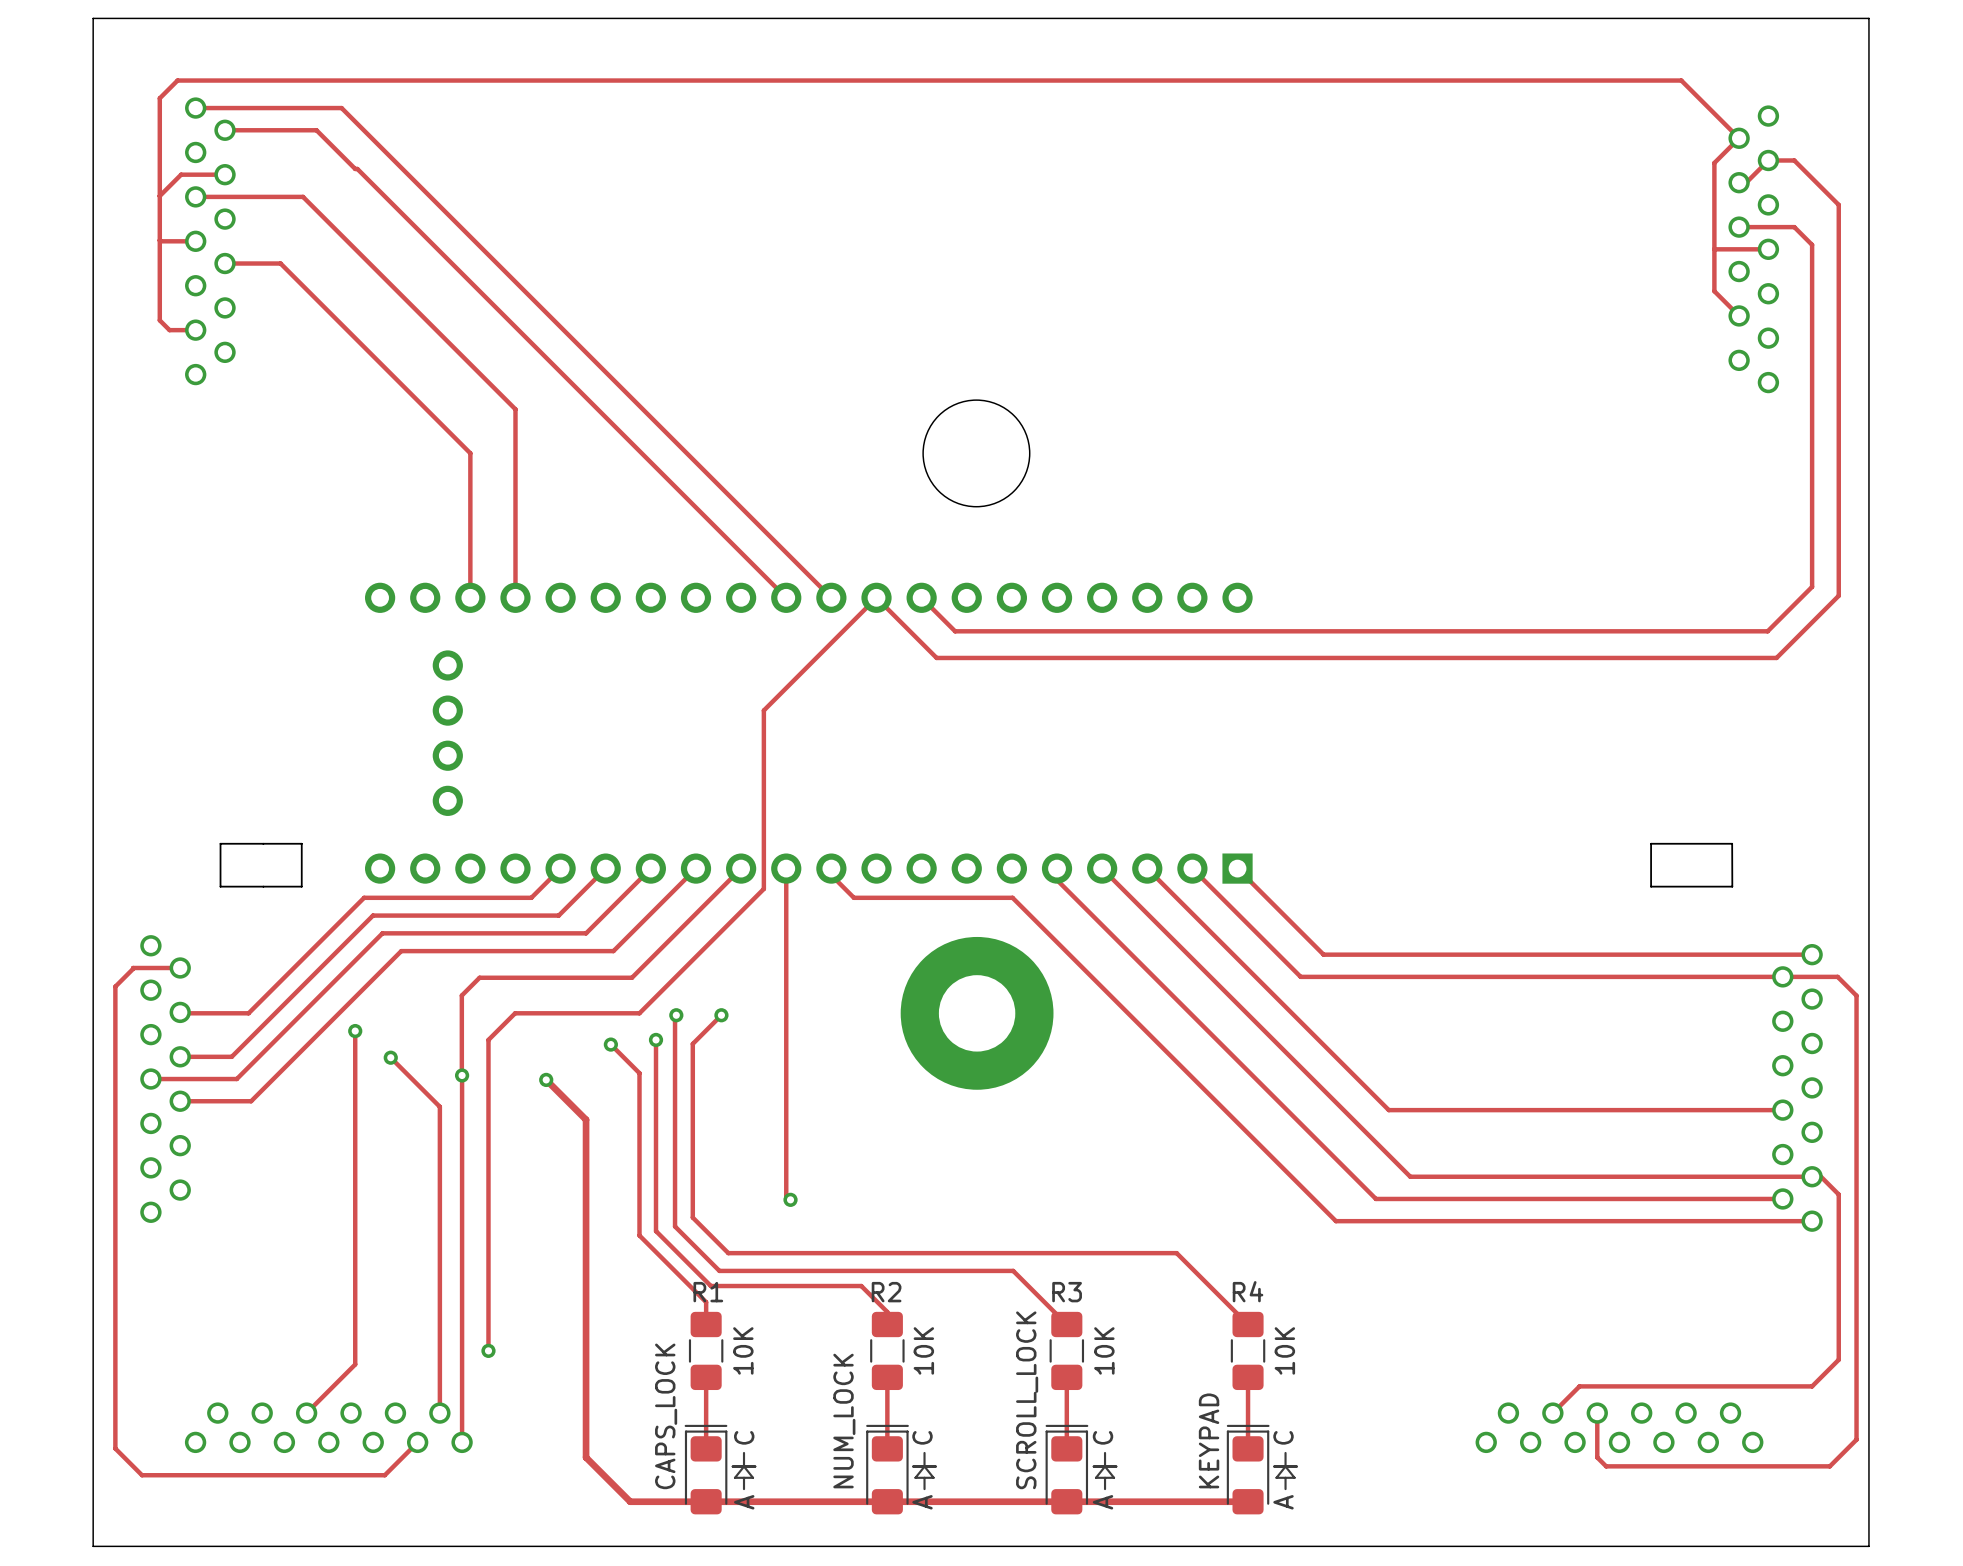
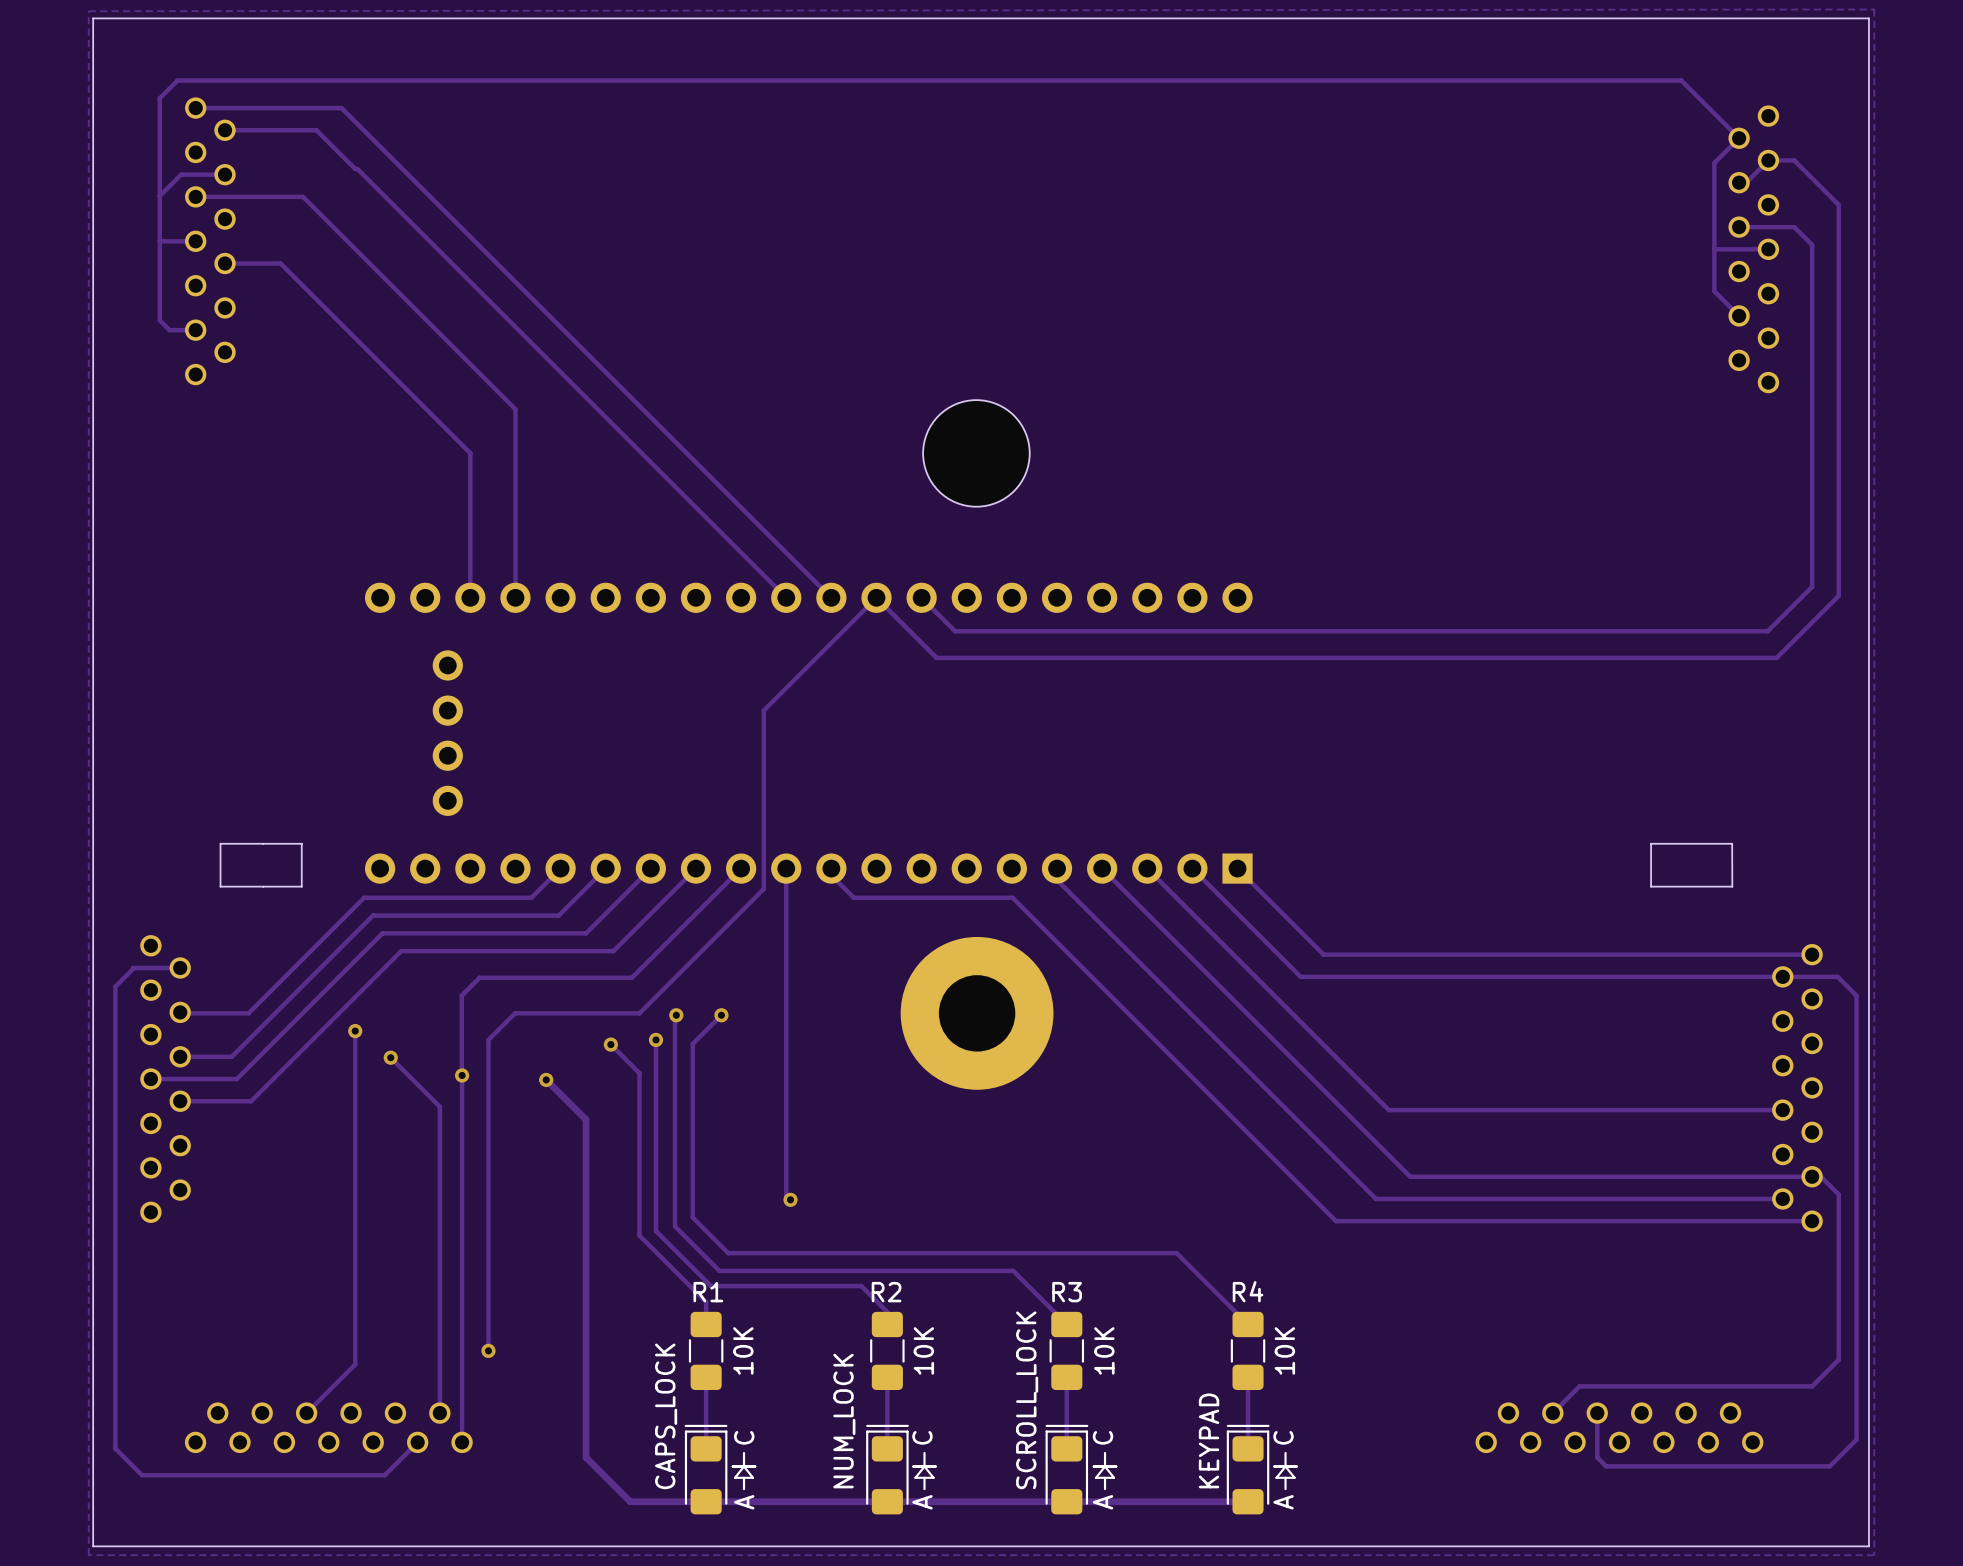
zone outline: none -> (1874, 9) (88, 11) (88, 1555) (1874, 1555) (1874, 9)

